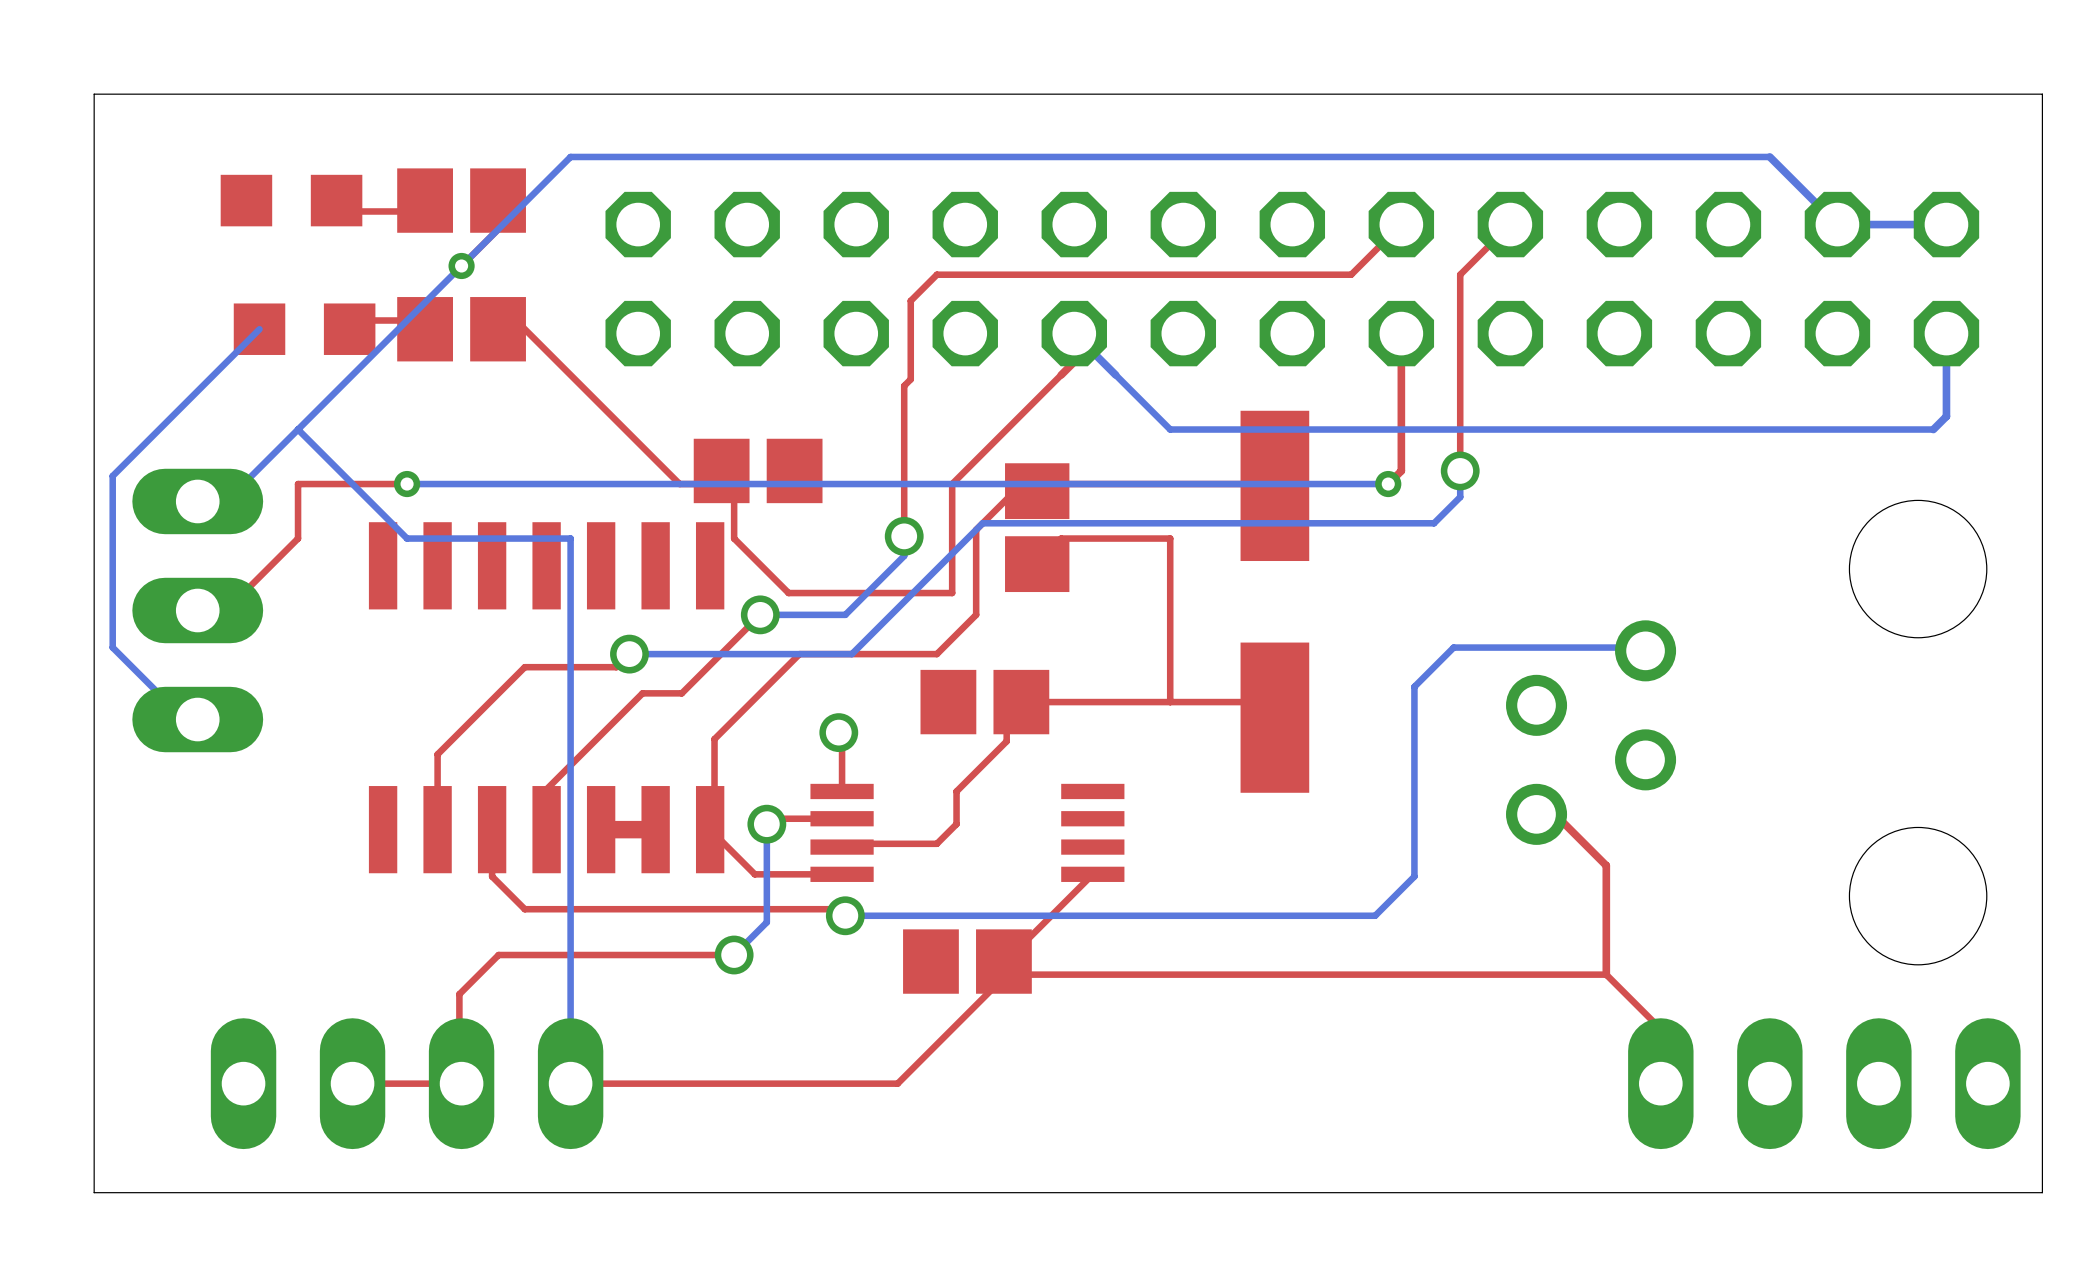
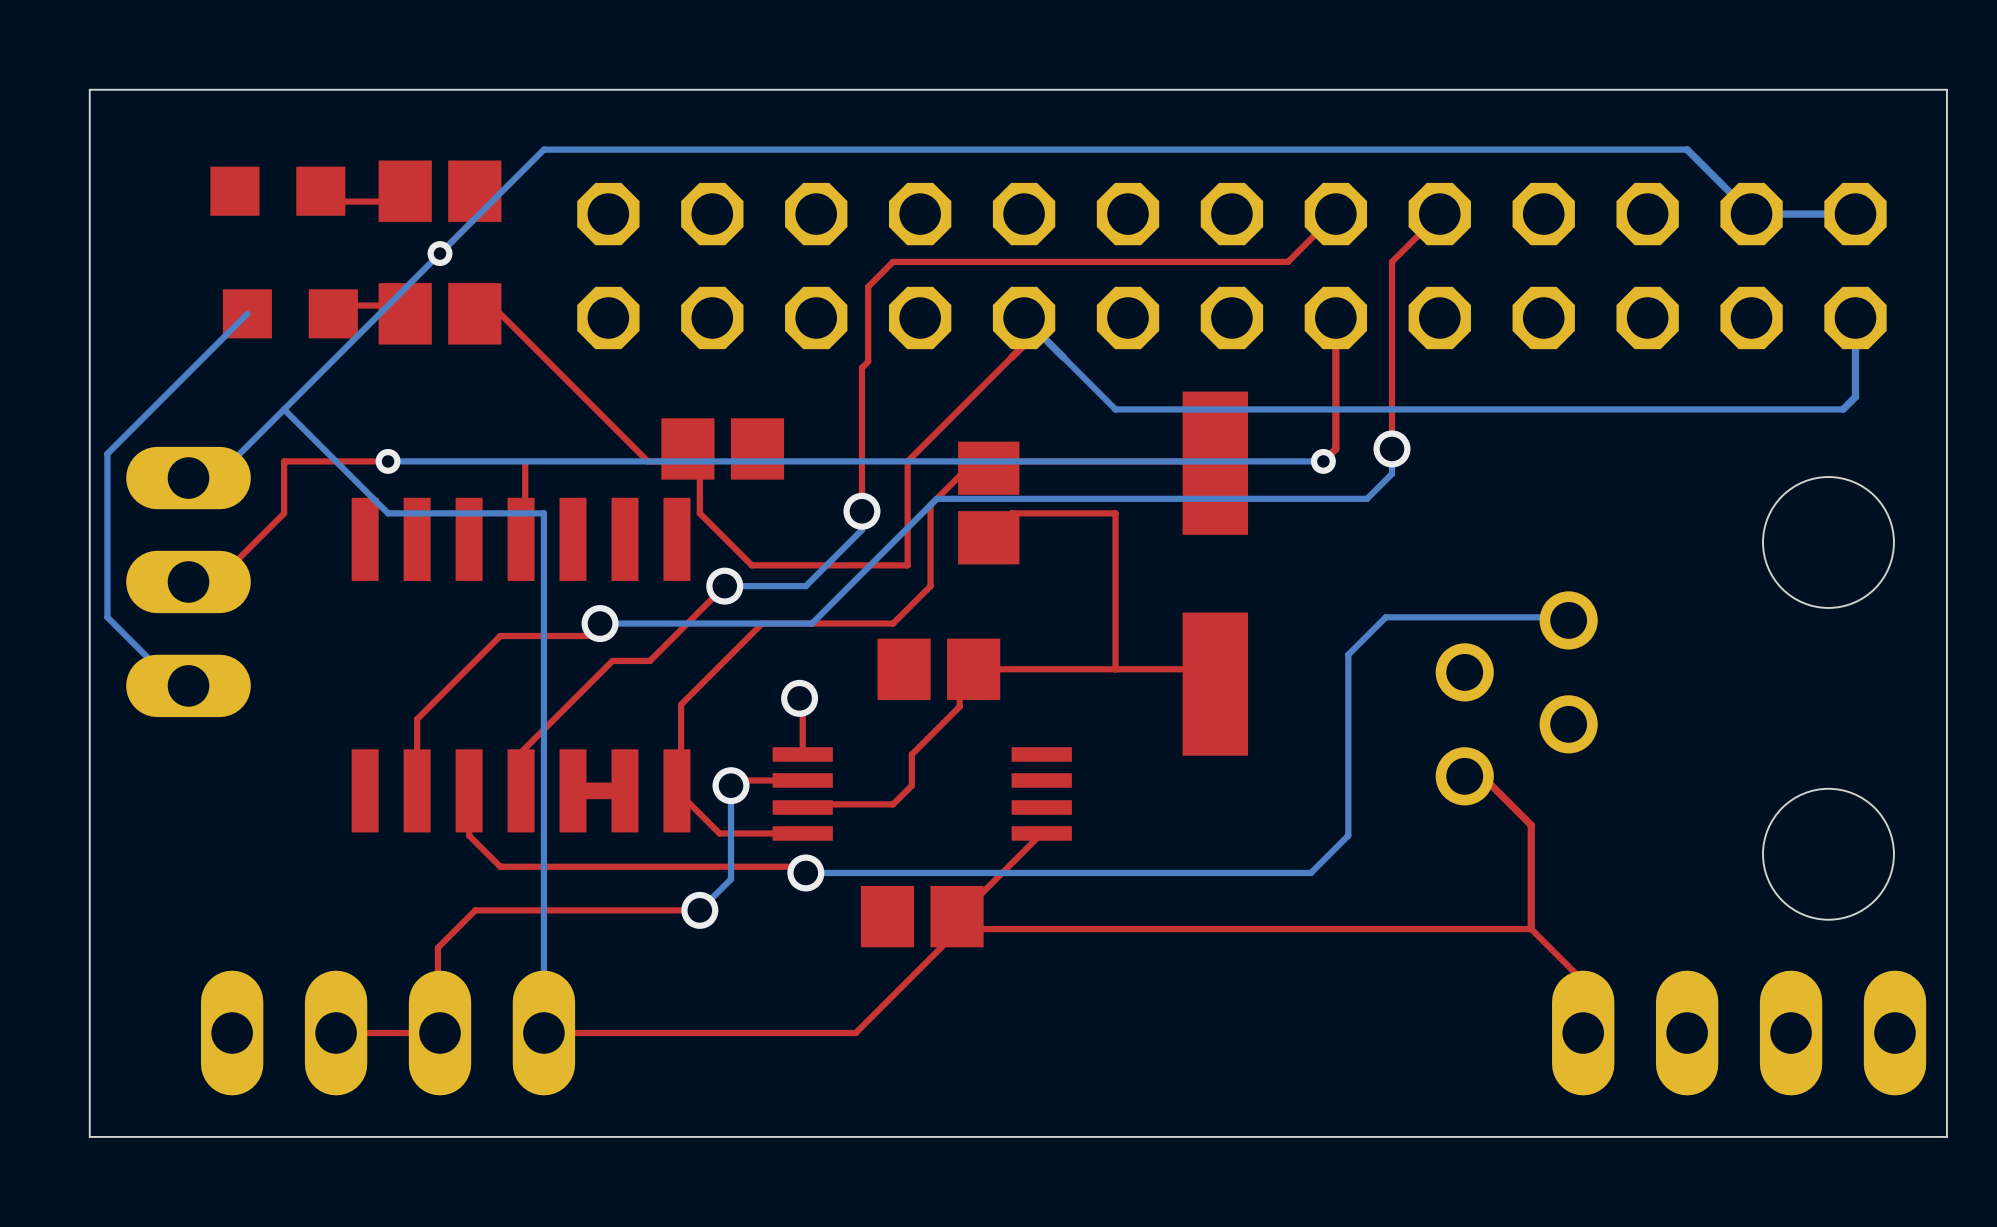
top track: none -> (525, 461) (525, 535) (521, 539)

